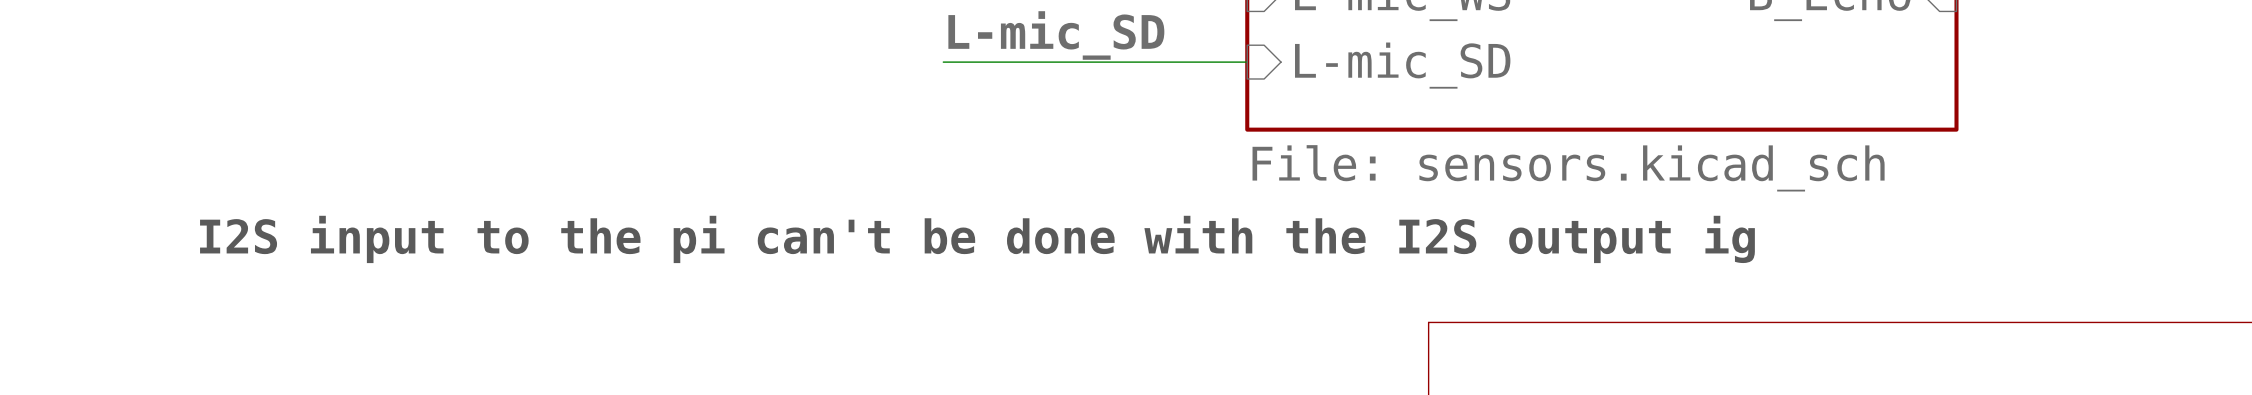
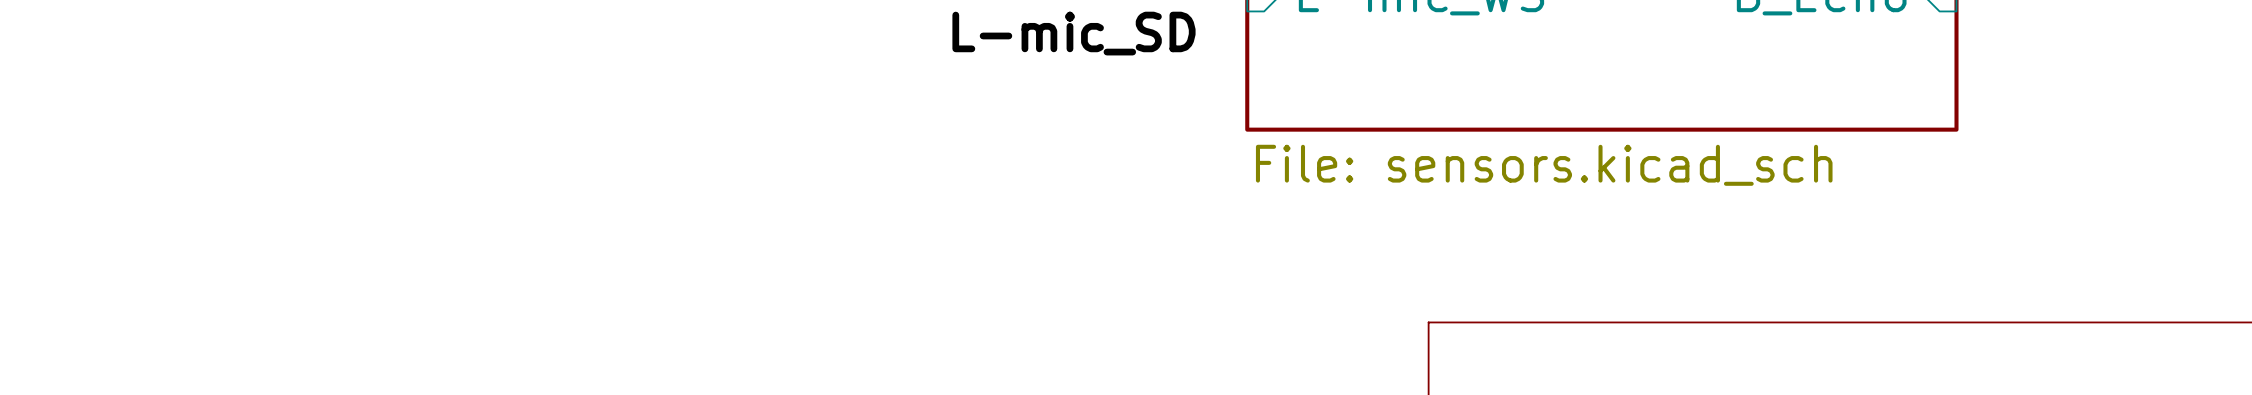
wire: (943, 62) (1247, 62) -> none
sheet pin: L-mic_SD (1402, 65) -> none
text: I2S input to the pi can't be done with the I2S output ig (977, 239) -> none

